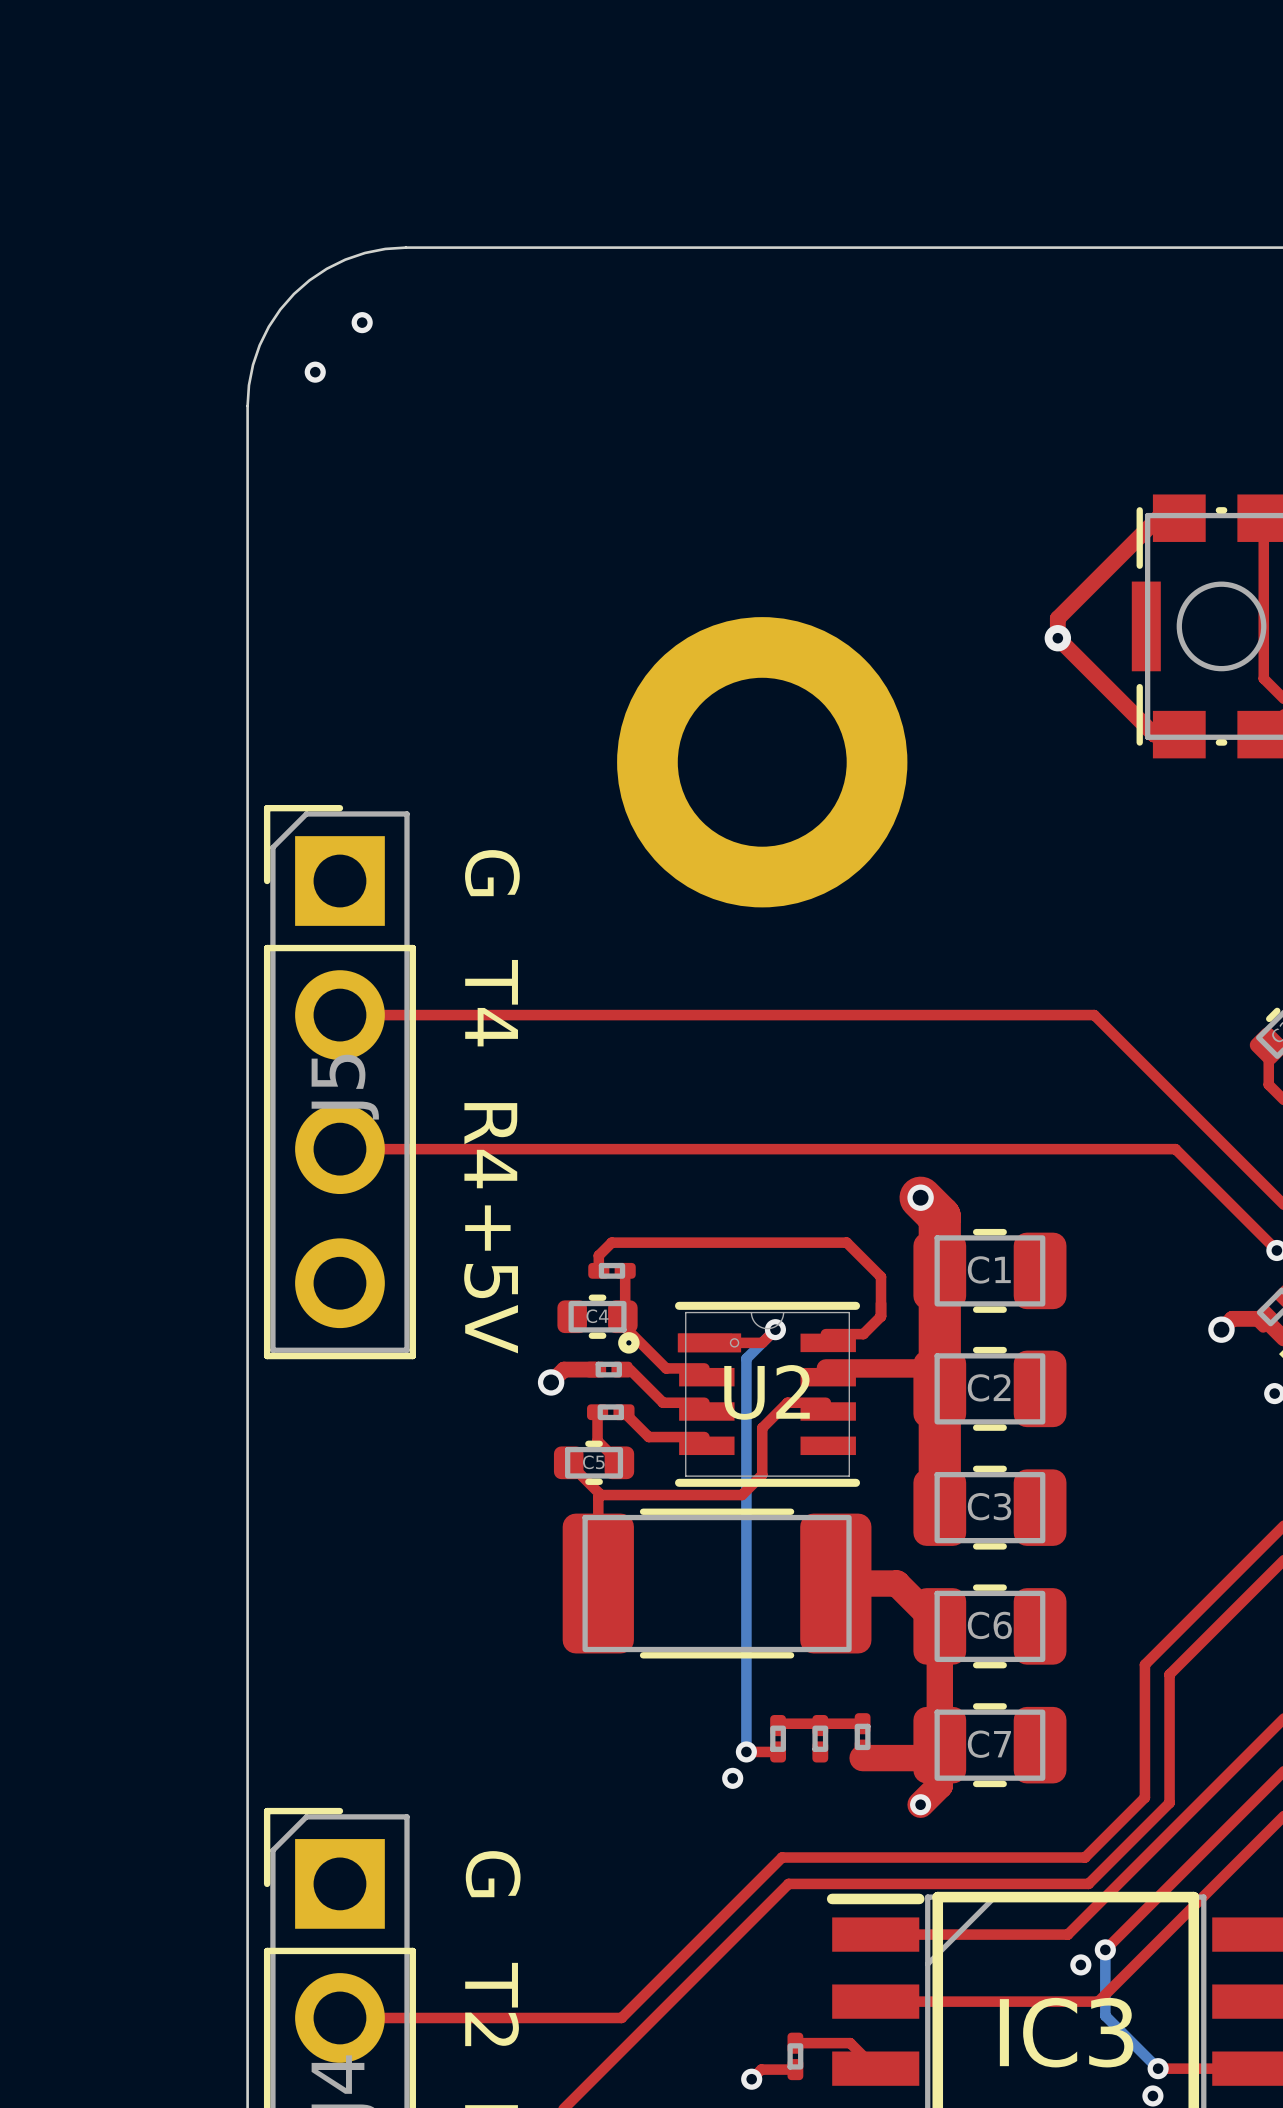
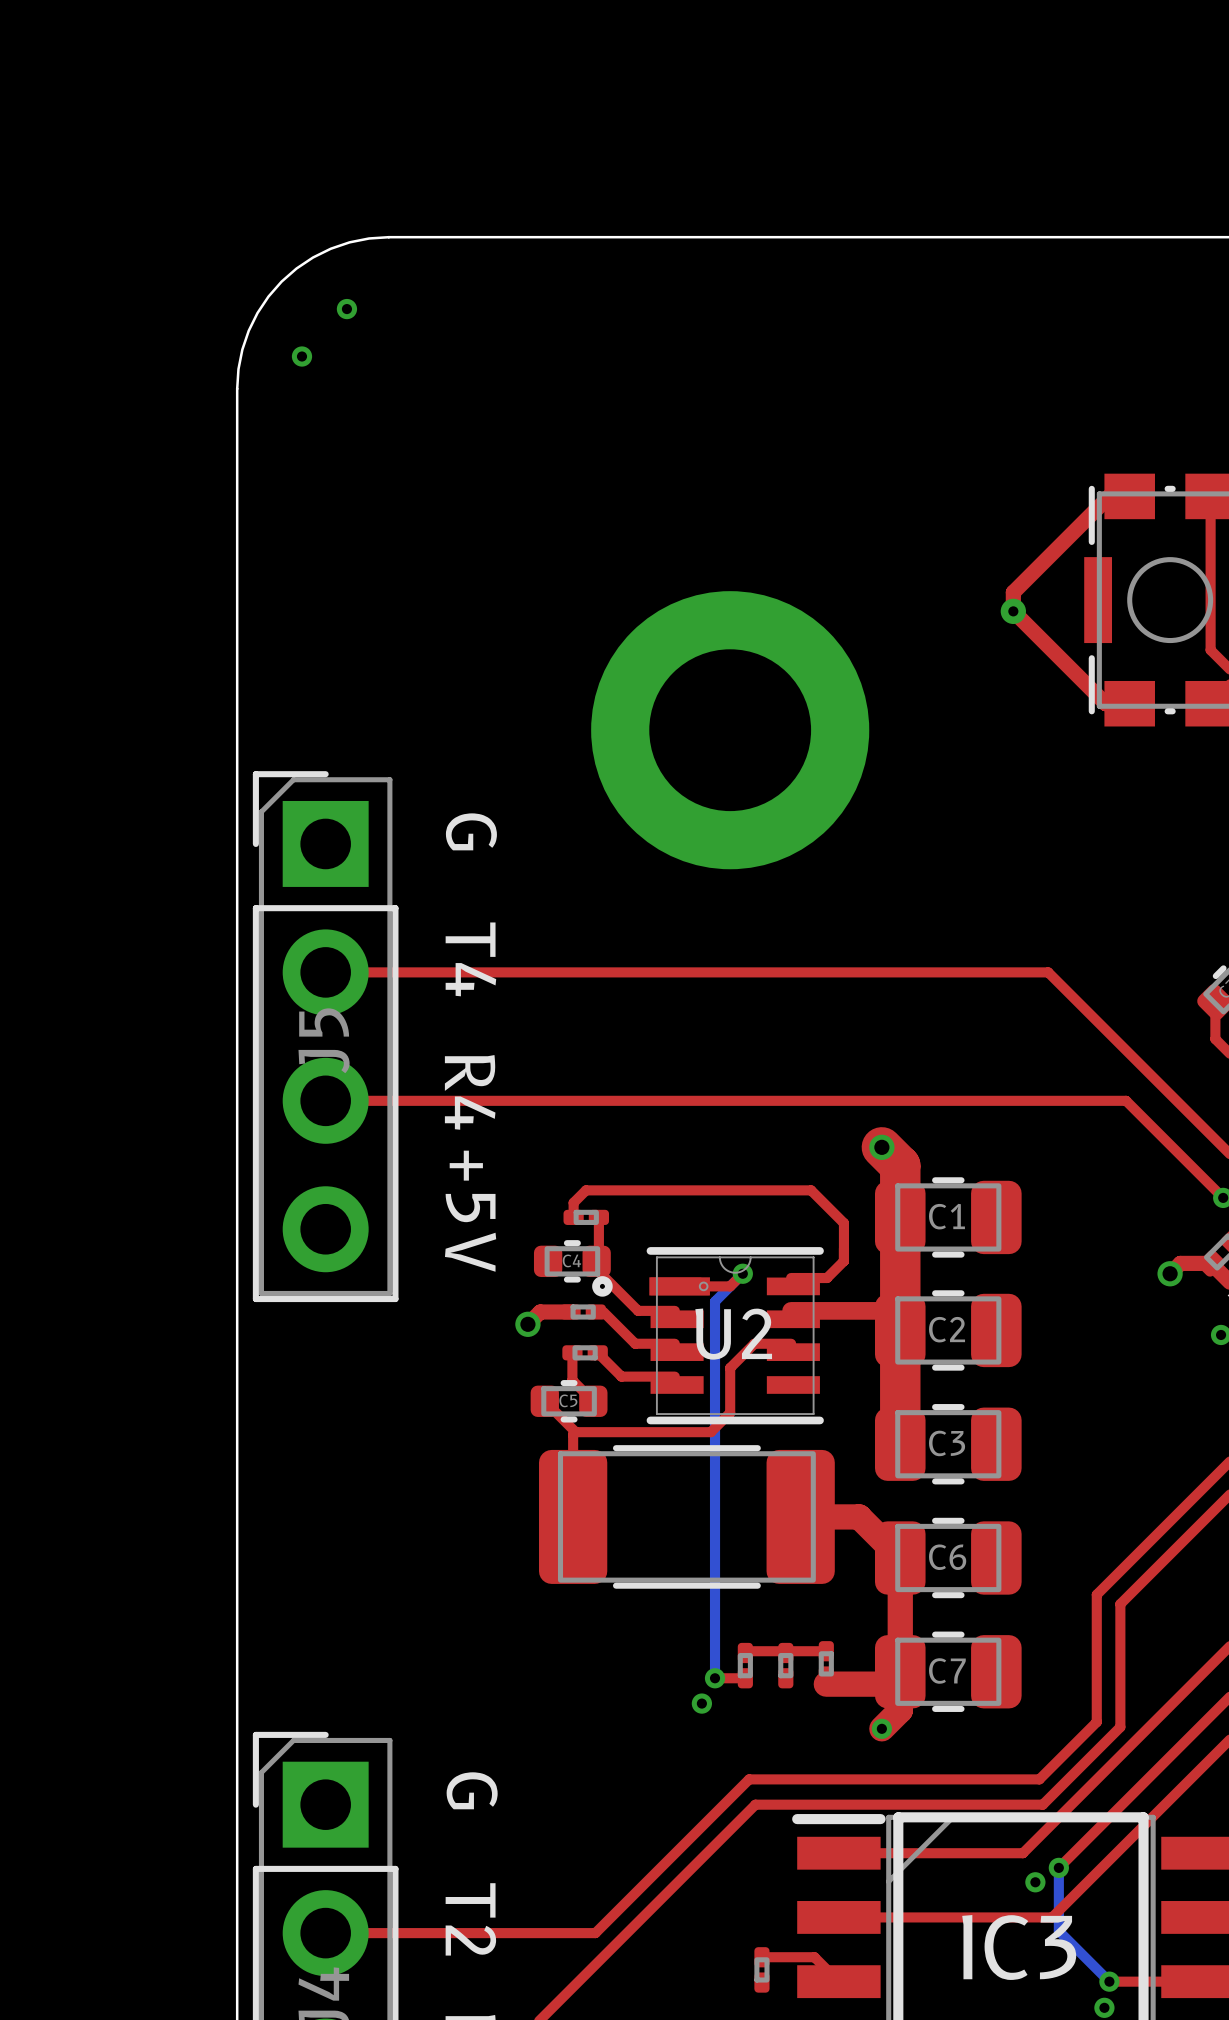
top track: (795, 2069) (761, 2069) (751, 2079) -> none
via: (751, 2079) -> none

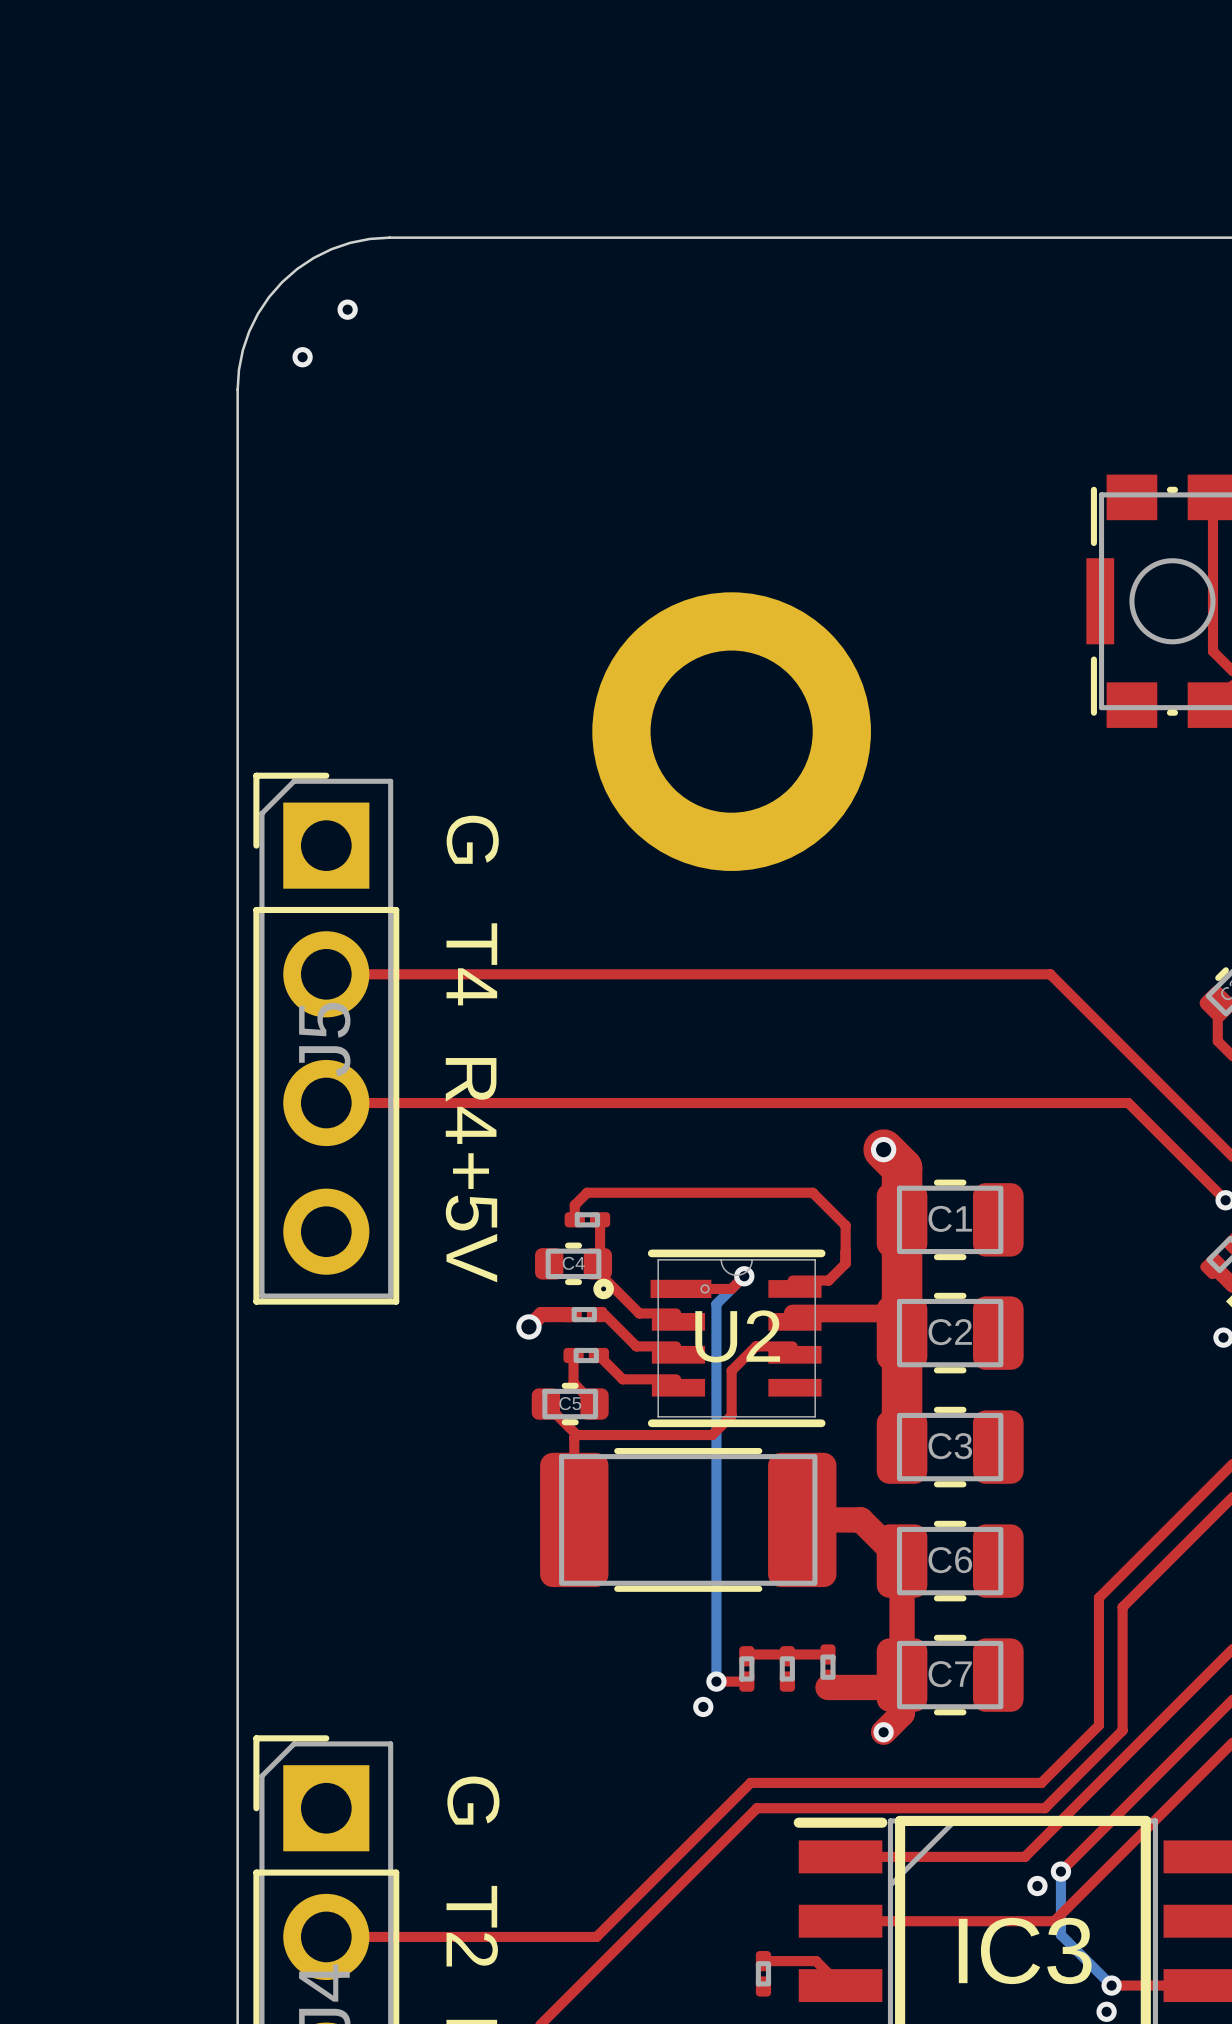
top track: (1129, 496) (1109, 496) (1013, 592) (1013, 611) (1105, 703) (1129, 703) -> none
via: (1013, 611) -> none
top track: (1211, 1263) (1180, 1263) (1170, 1273) -> none
via: (1170, 1273) -> none

